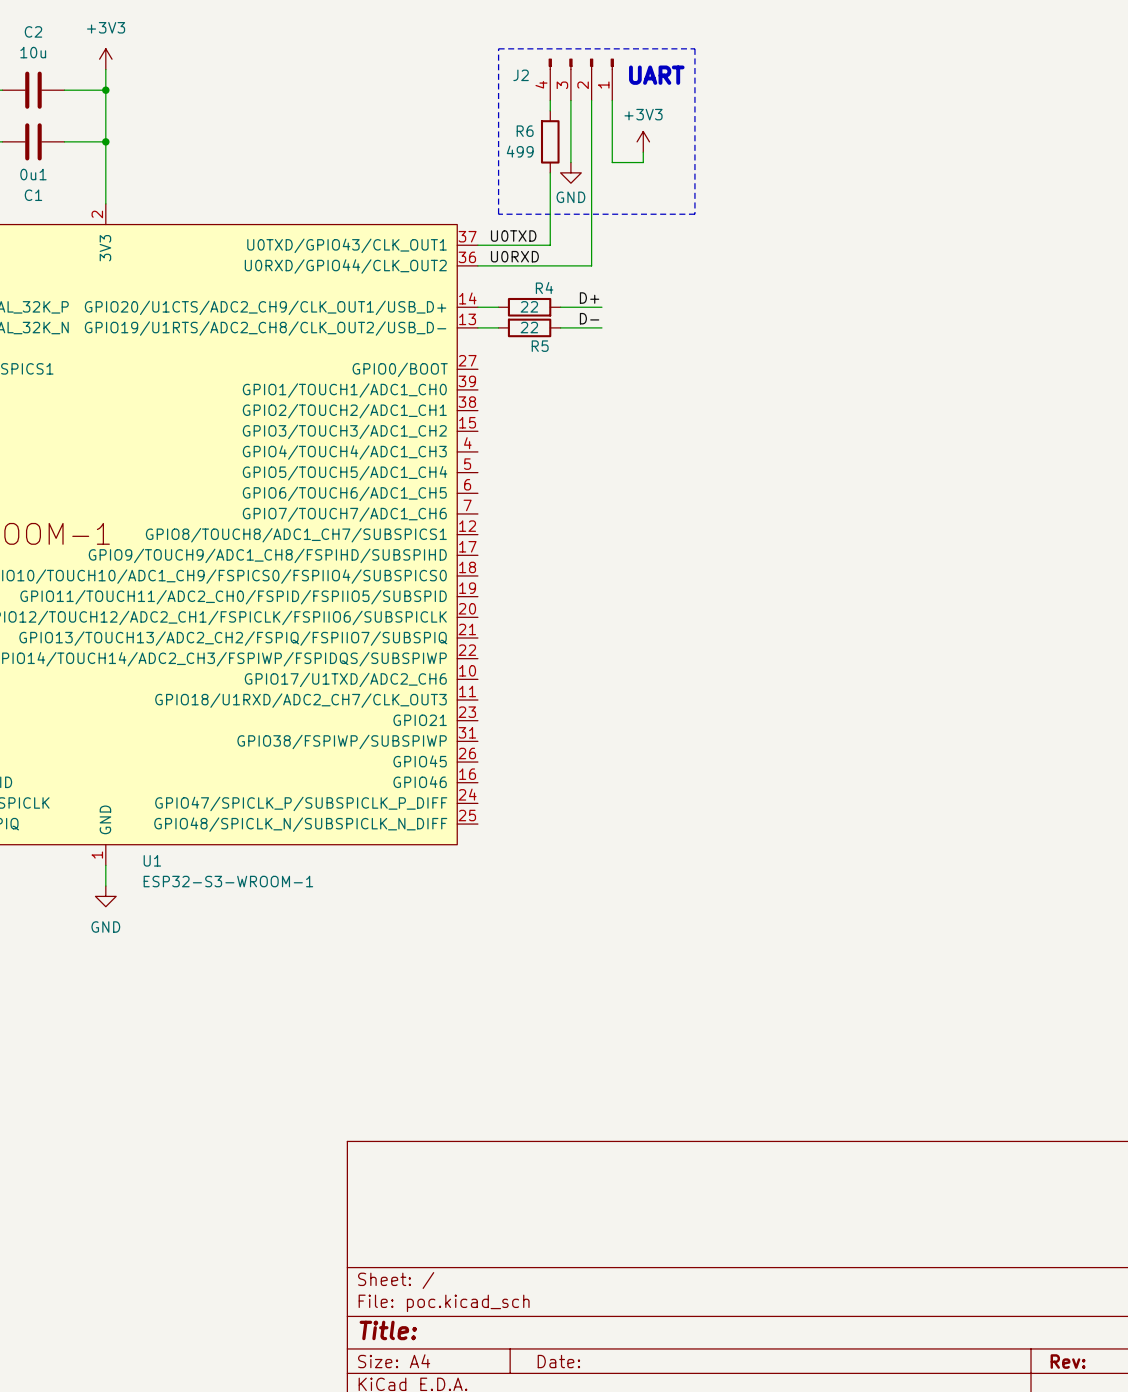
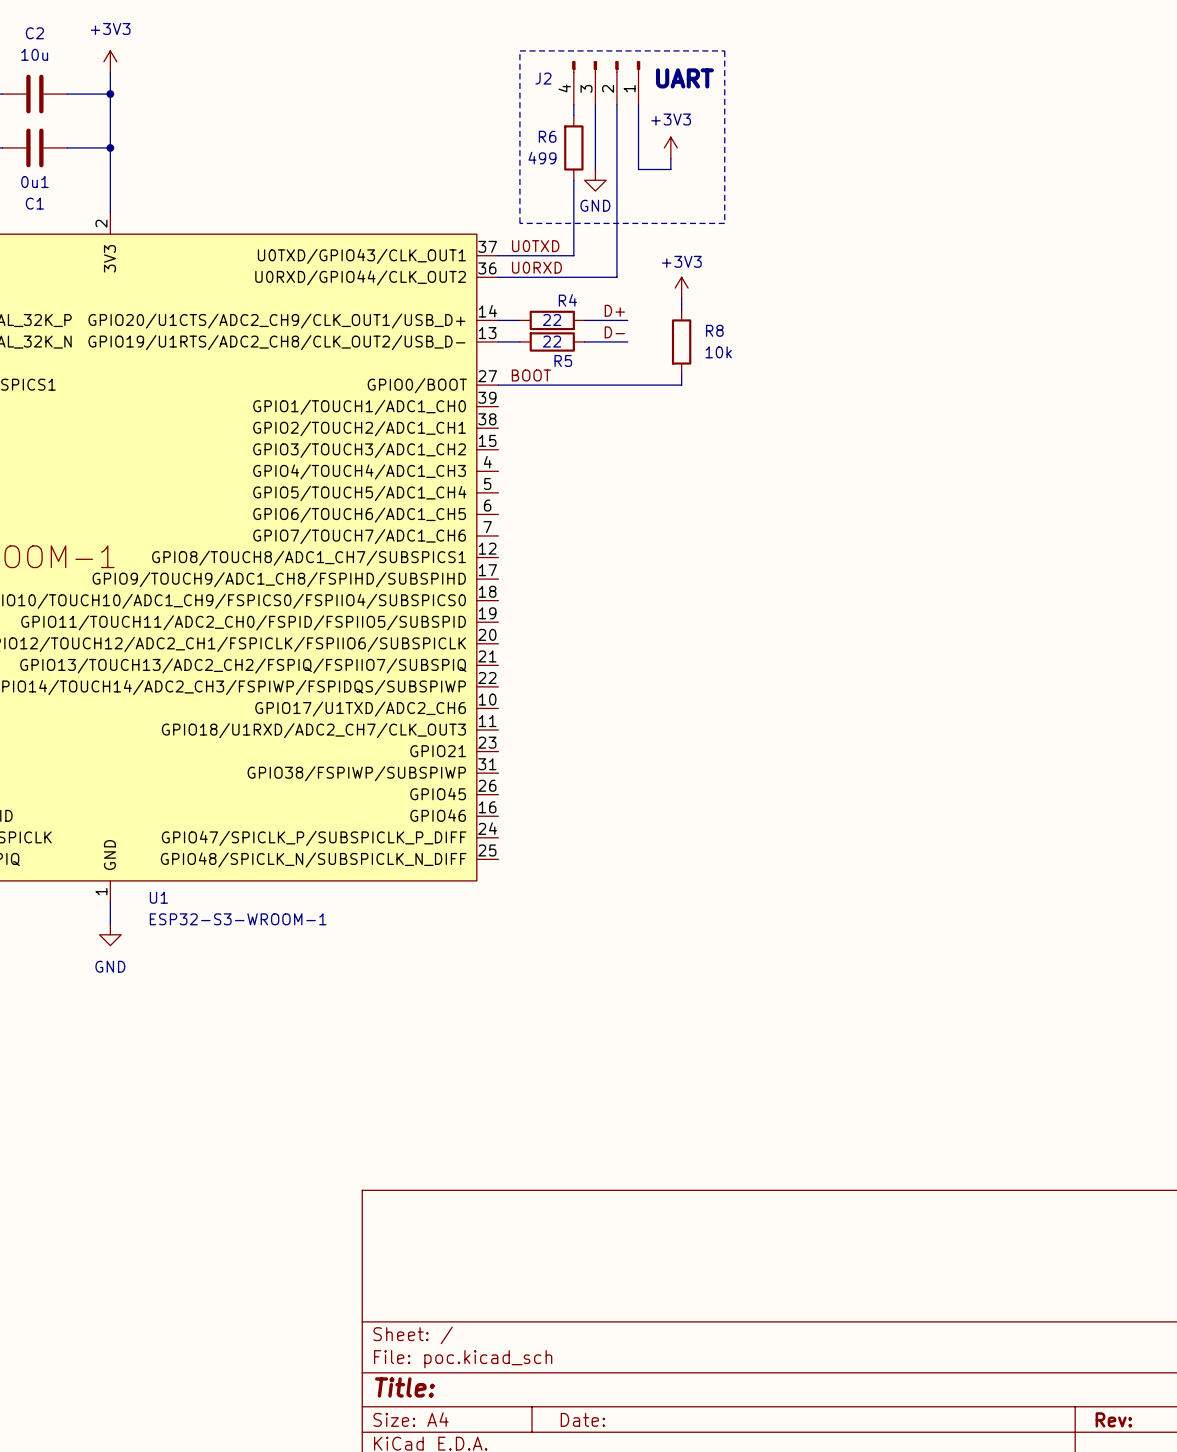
power symbol: none -> +3V3 (681, 288)
wire: none -> (681, 298) (681, 309)
R8: none -> 10k (681, 341)
wire: none -> (681, 374) (681, 385) (498, 385)
label: none -> BOOT (531, 375)

